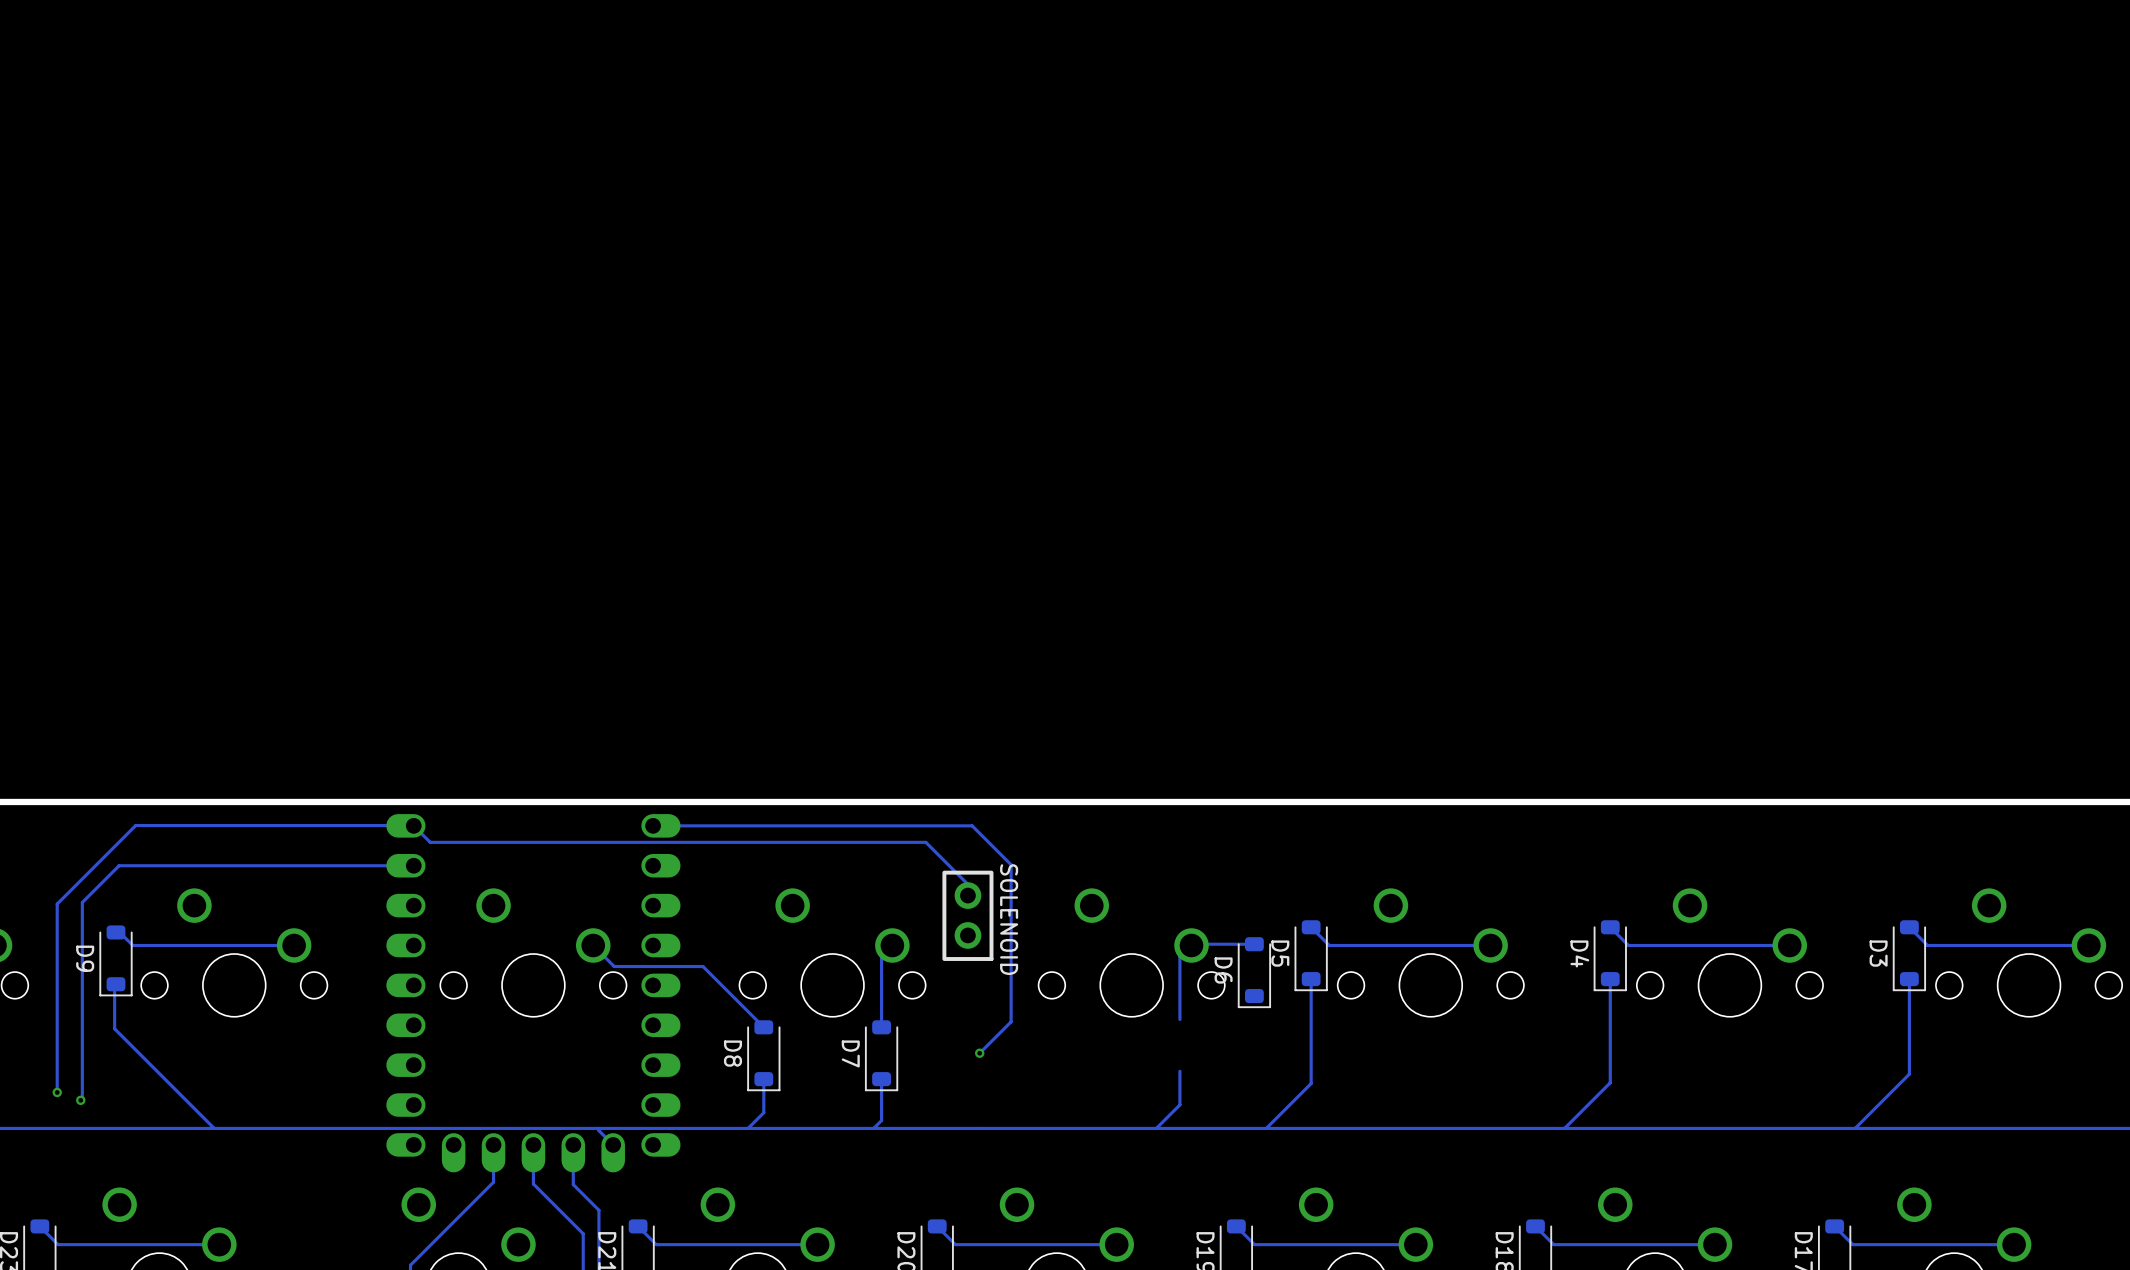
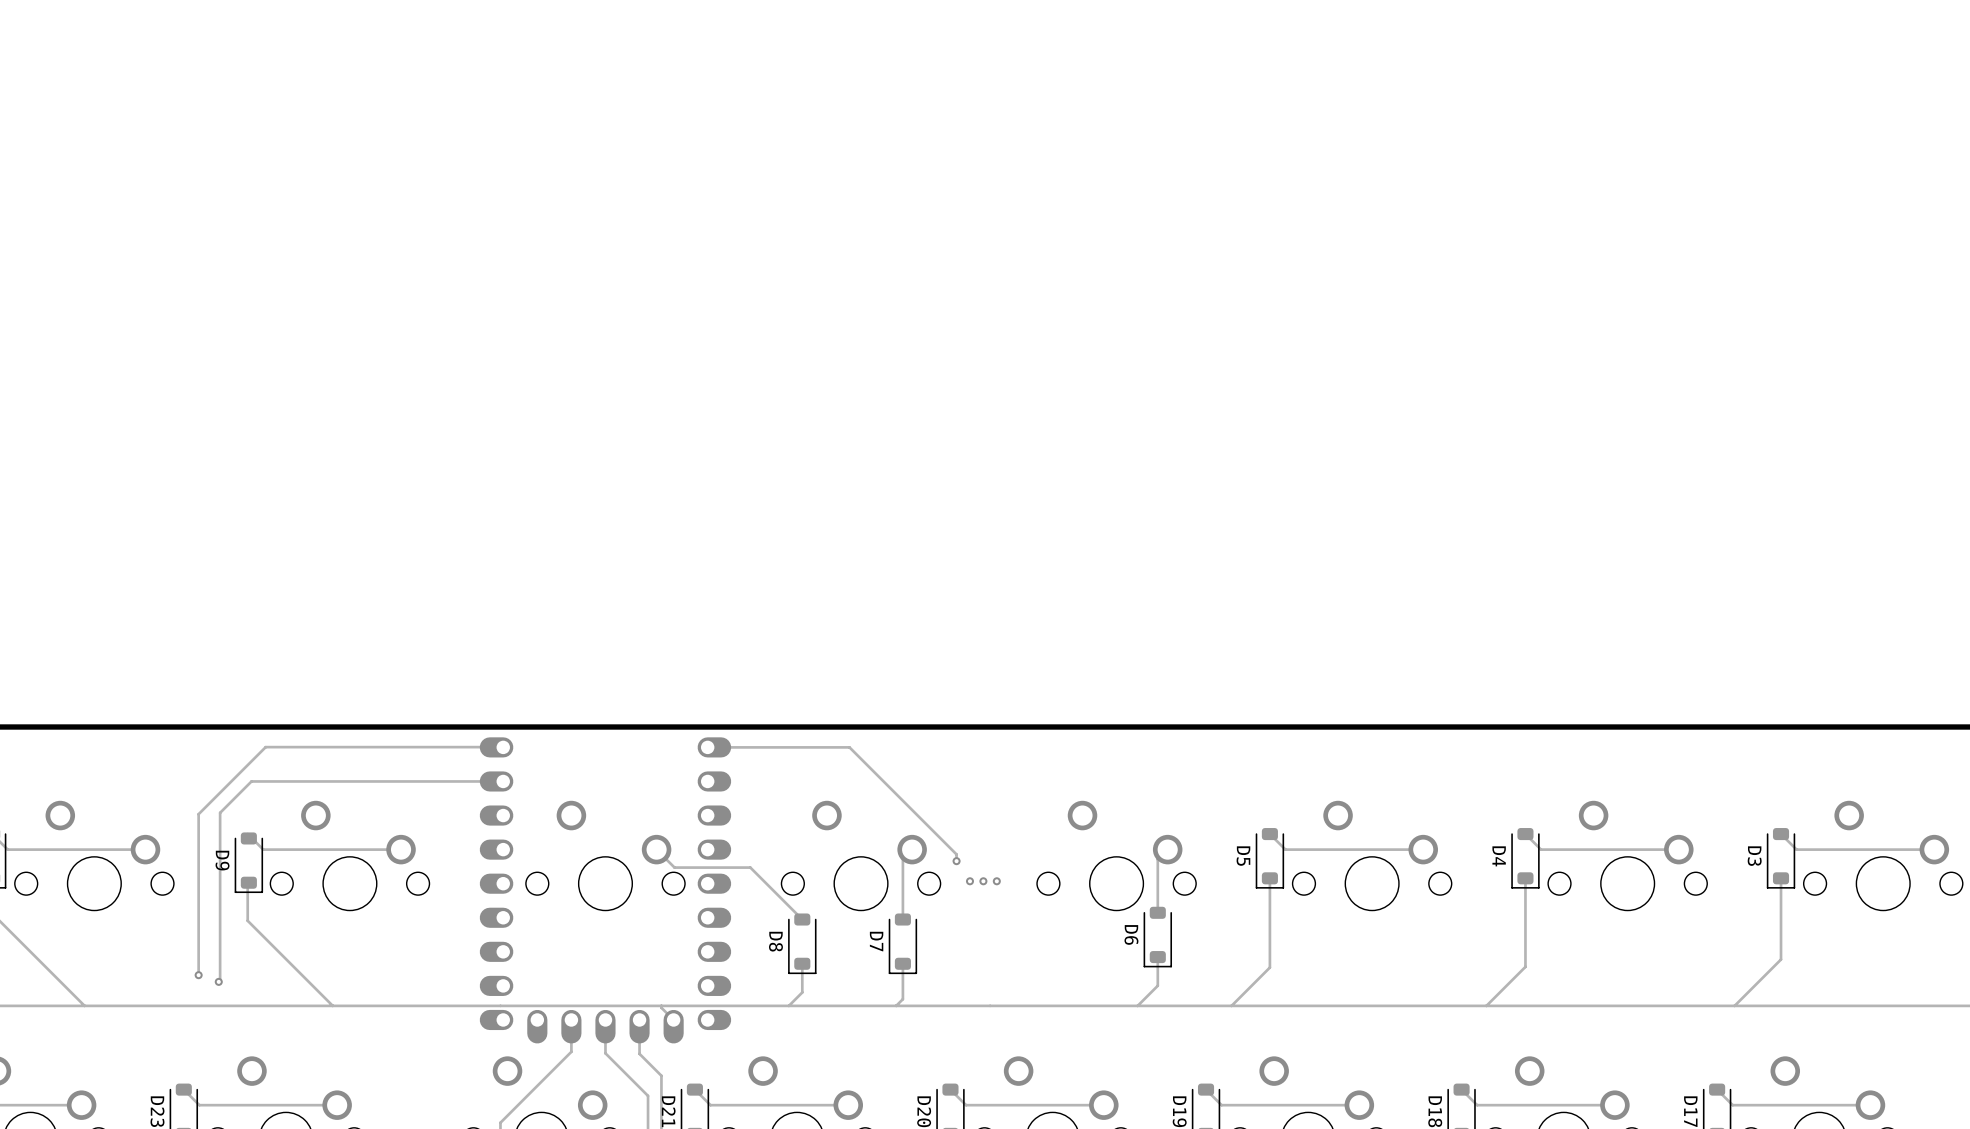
track: (413, 825) (430, 842) (925, 842) (967, 884) (967, 895) -> none
track: (819, 825) (972, 825) (1011, 864) (1011, 1021) (979, 1053) -> (849, 747) (956, 854) (956, 861)
part: (967, 915) -> none
track: (1254, 944) (1191, 945) -> none
via: none -> (956, 861)
D6 position: (1254, 972) -> (1157, 937)
via: none -> (969, 881)
via: none -> (983, 881)
via: none -> (996, 881)
via: (979, 1053) -> none

